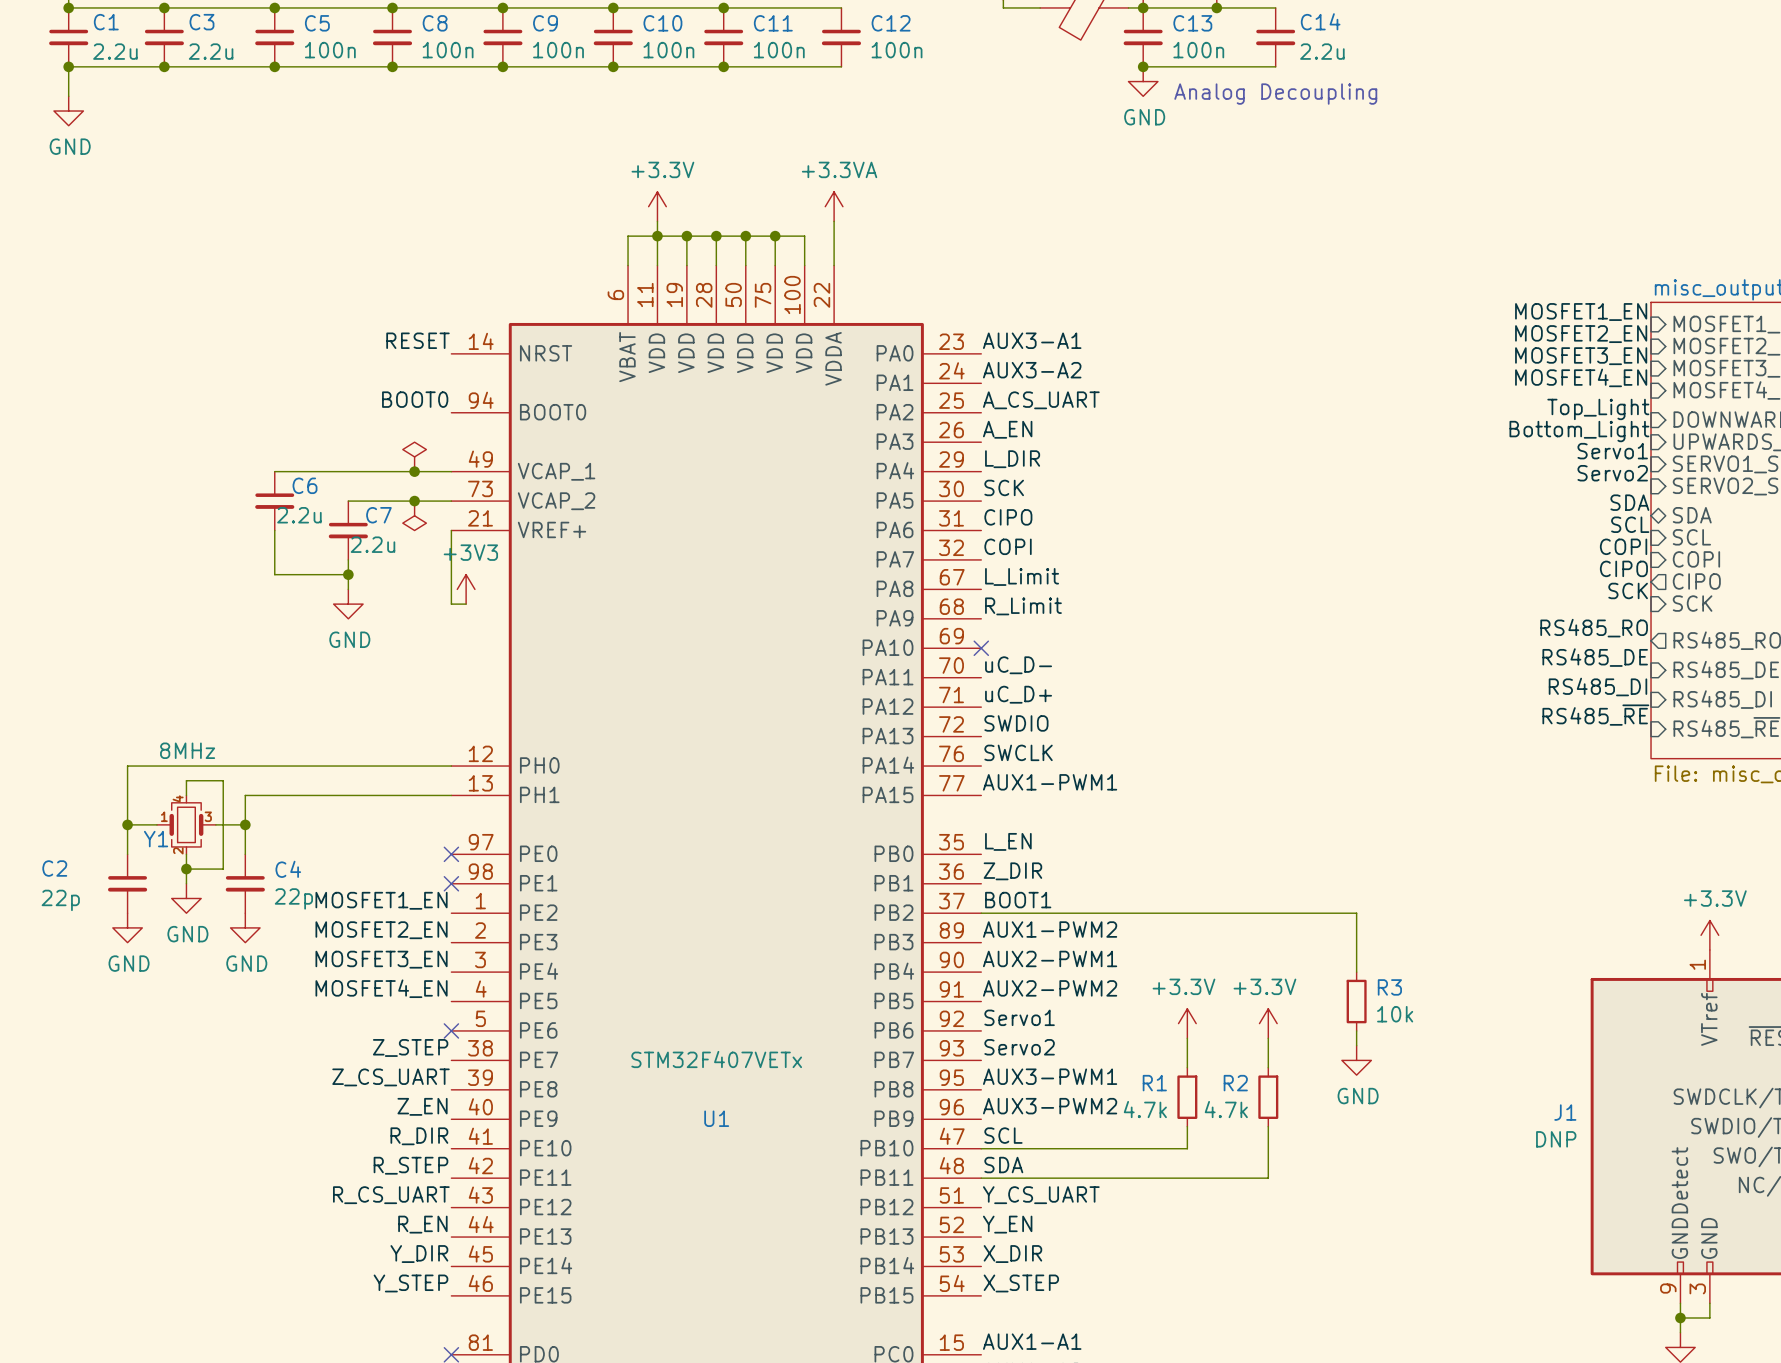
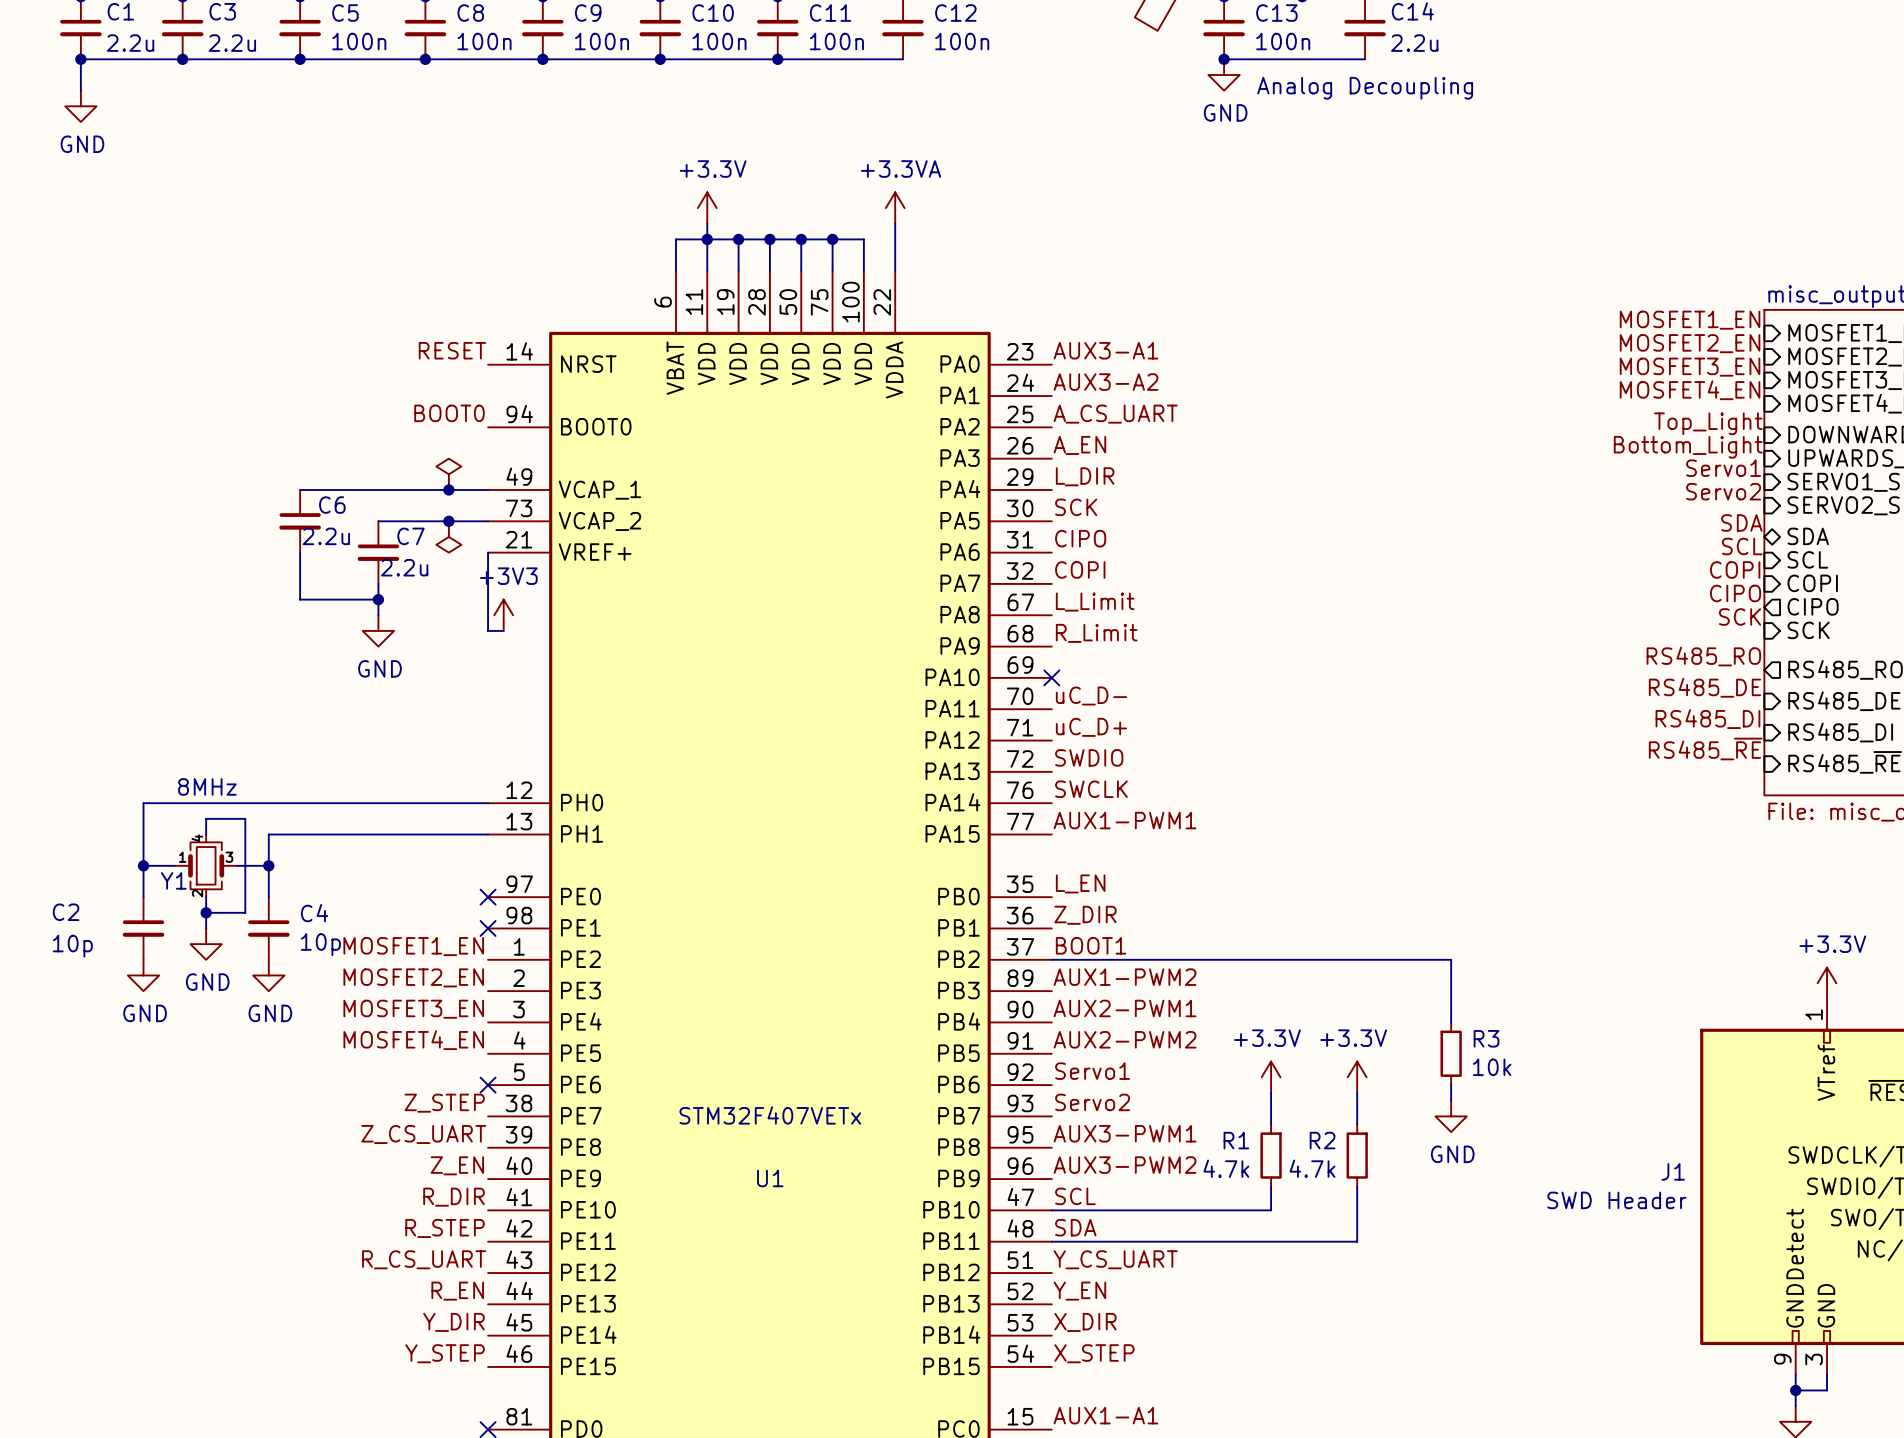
C4 value: 22p (293, 898) -> 10p (320, 944)
C2 value: 22p (60, 900) -> 10p (72, 946)
J1 value: DNP (1556, 1139) -> SWD Header (1616, 1200)

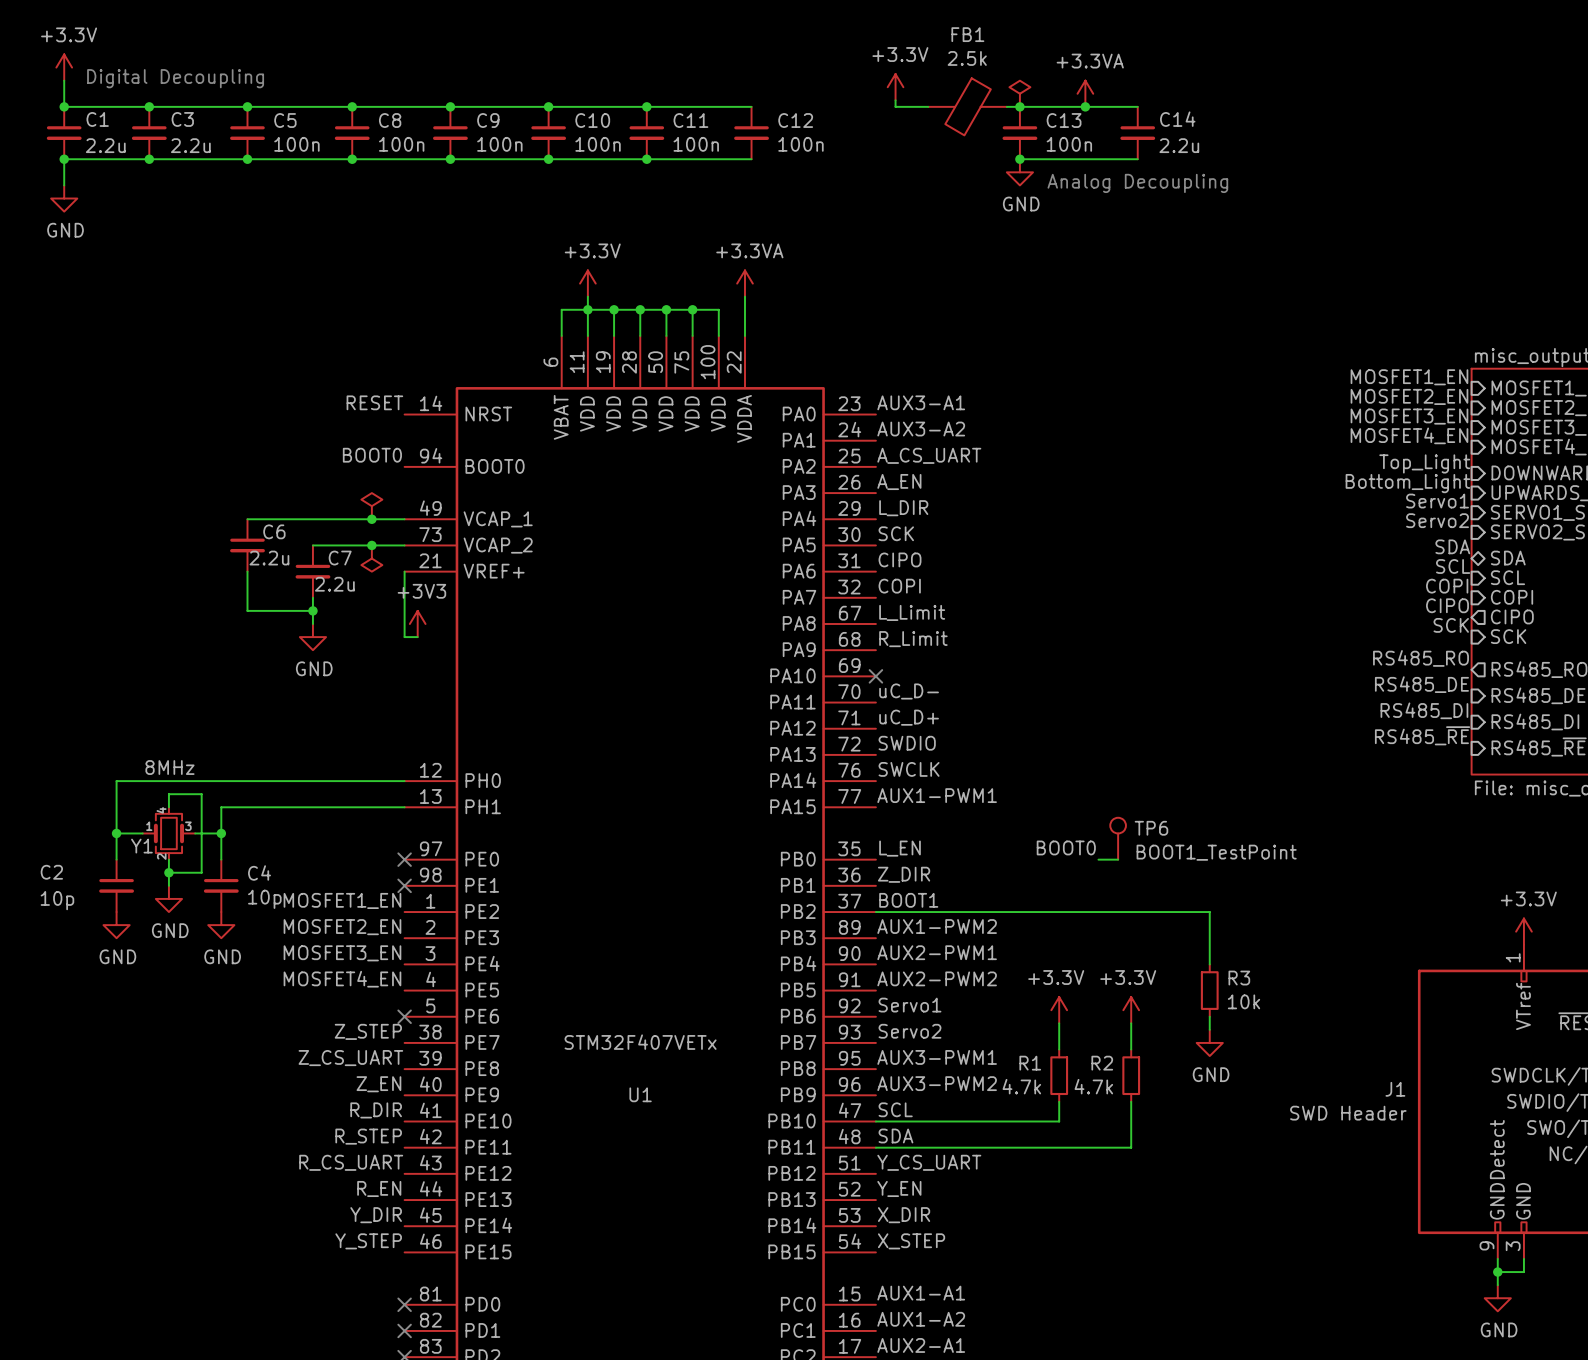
TP6: none -> BOOT1_TestPoint (1118, 838)
label: none -> BOOT0 (1066, 847)
wire: none -> (1098, 859) (1118, 859)

